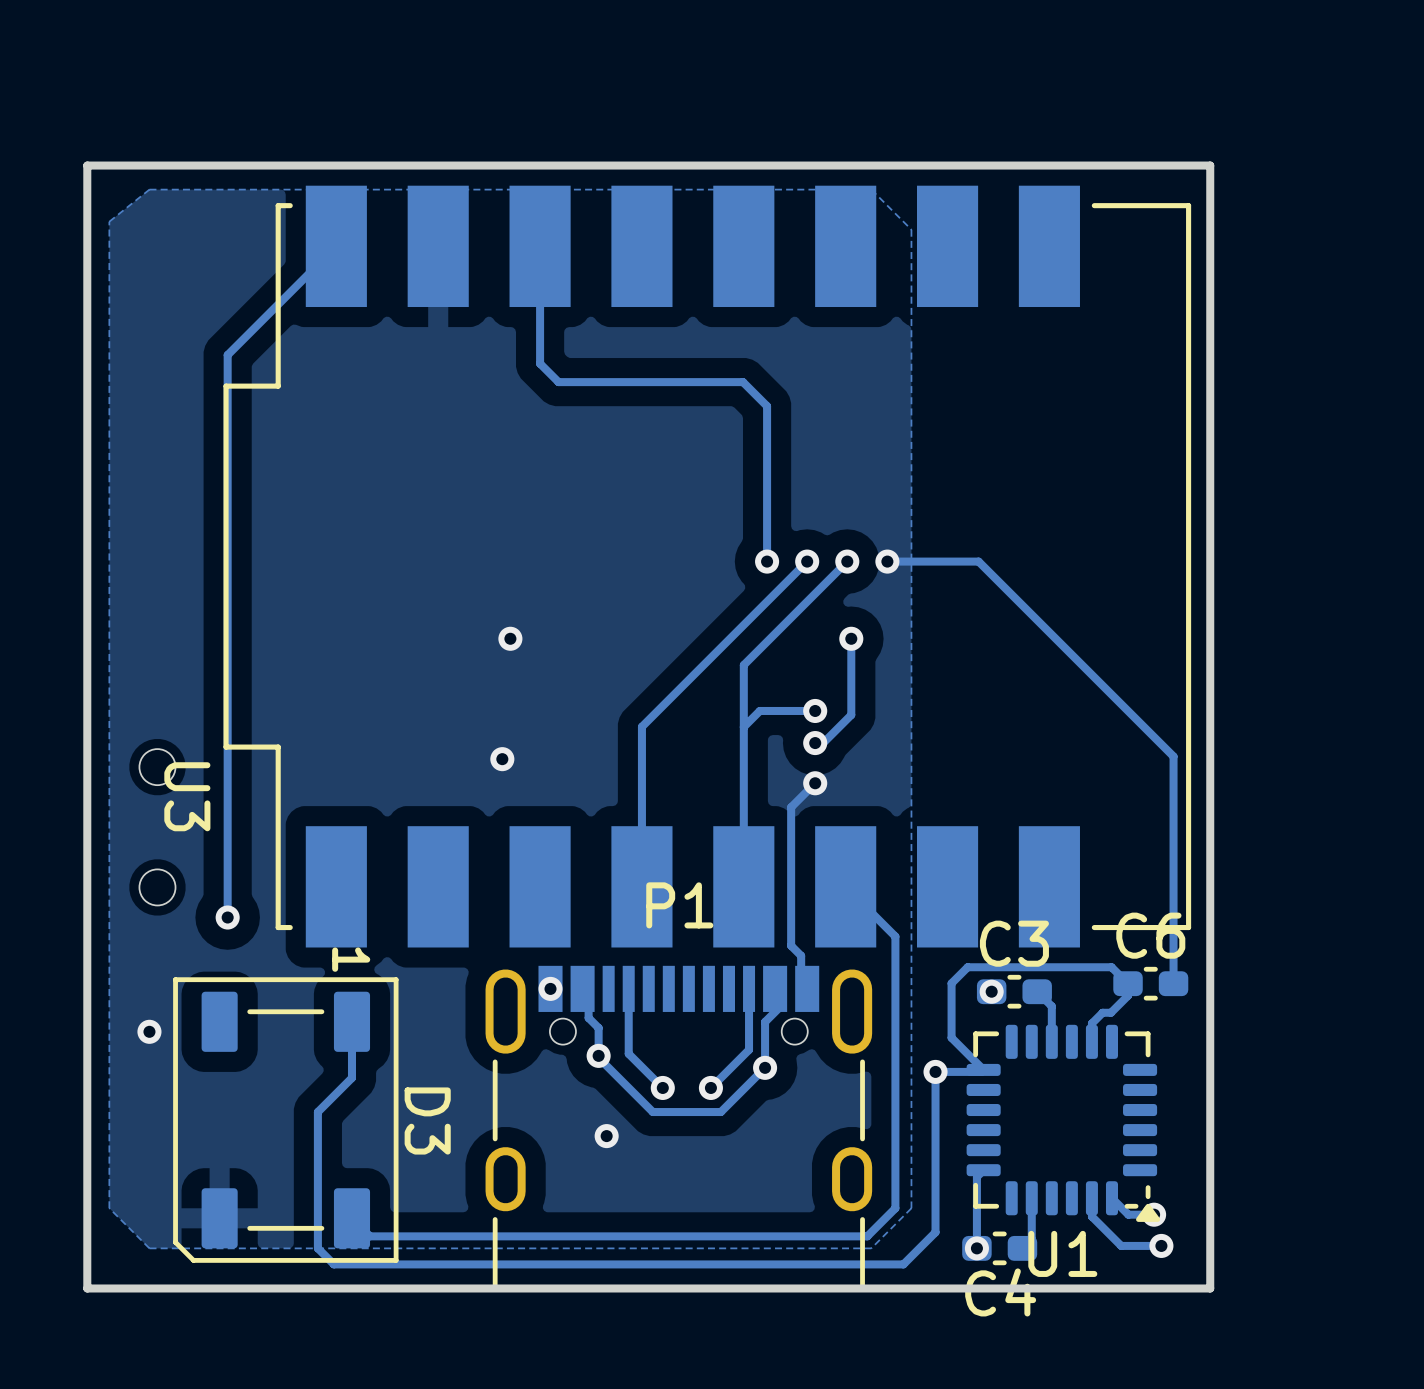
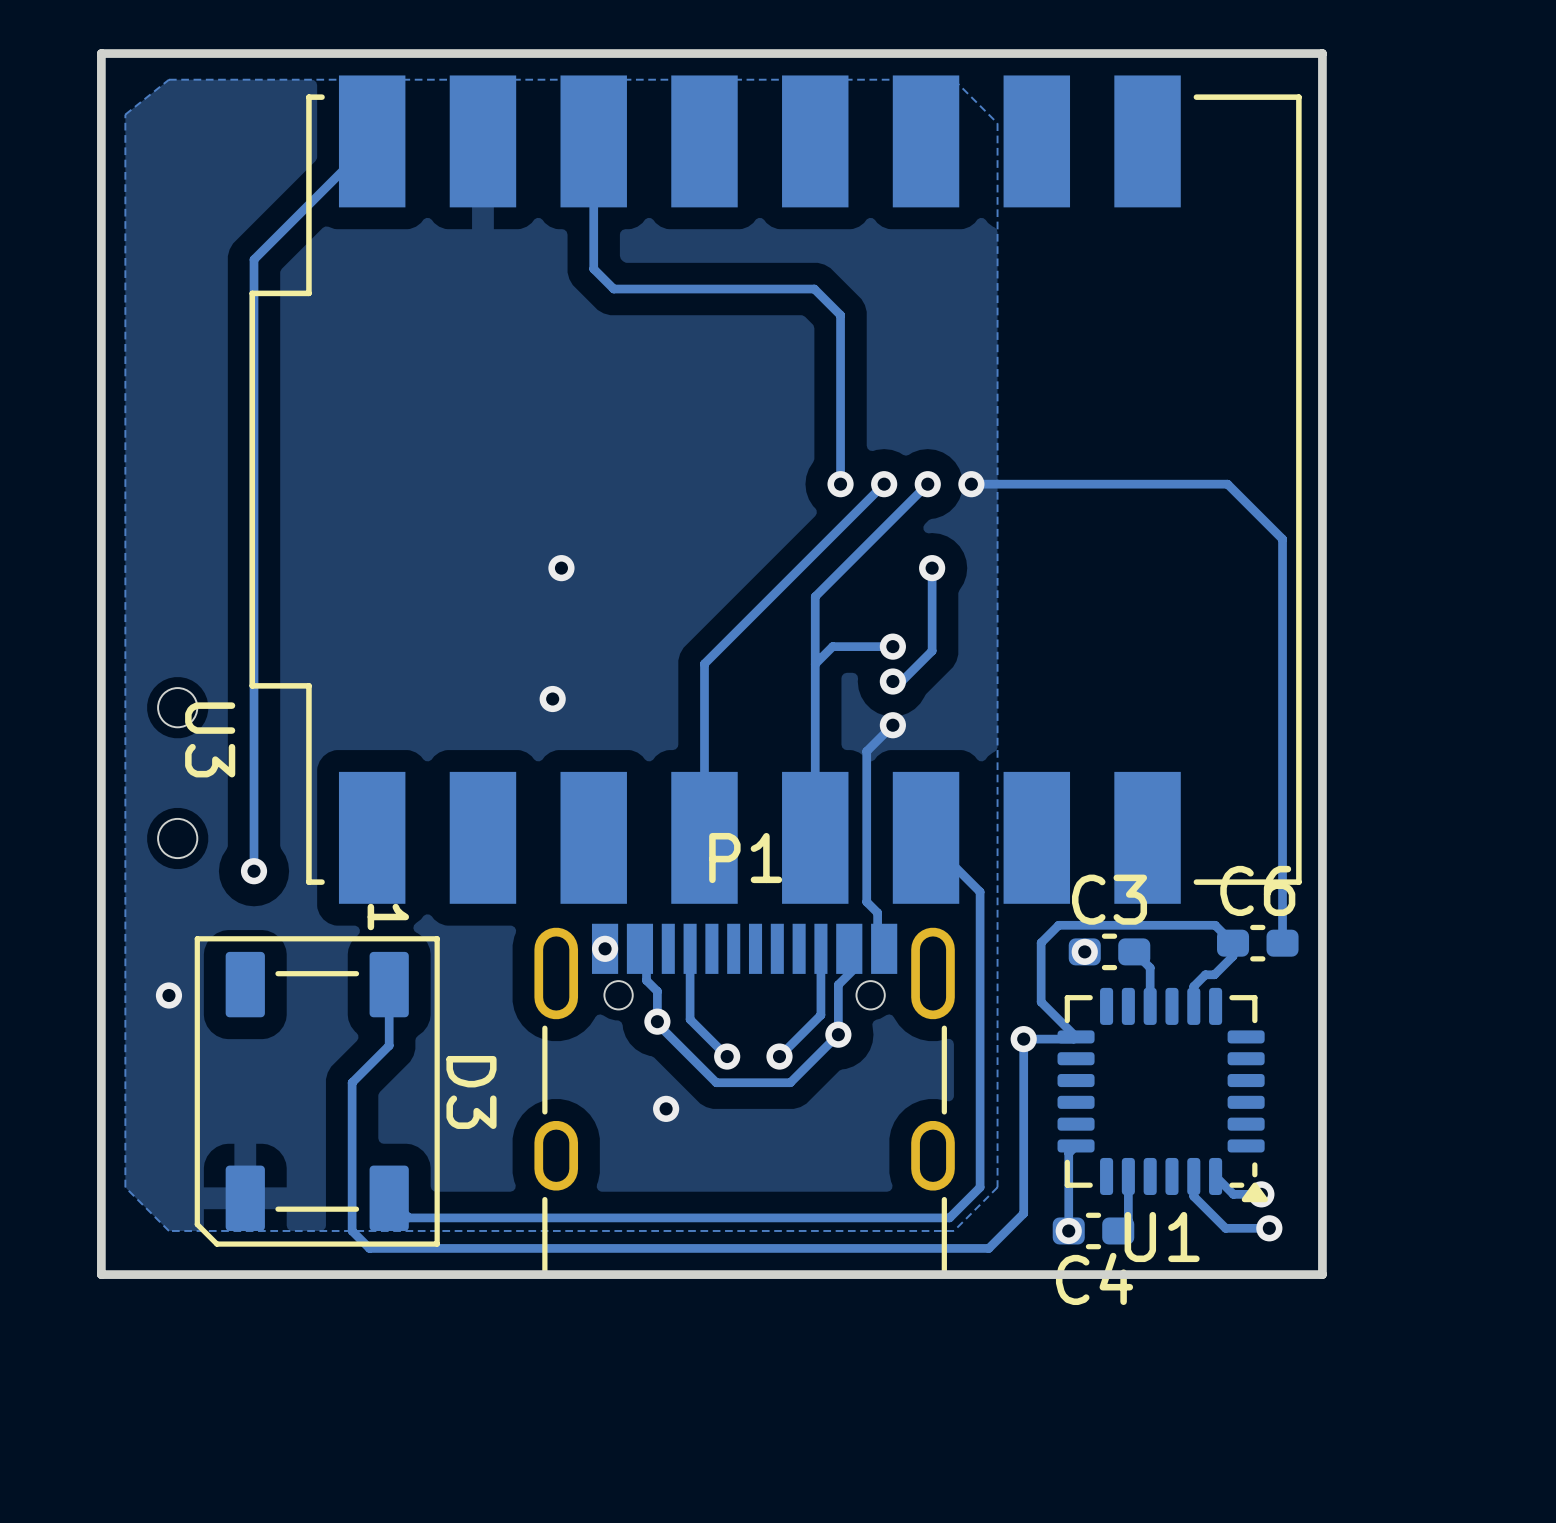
track: (978, 561) (1173, 756) -> (1070, 484) (1227, 484) (1282, 539) (1282, 696)

